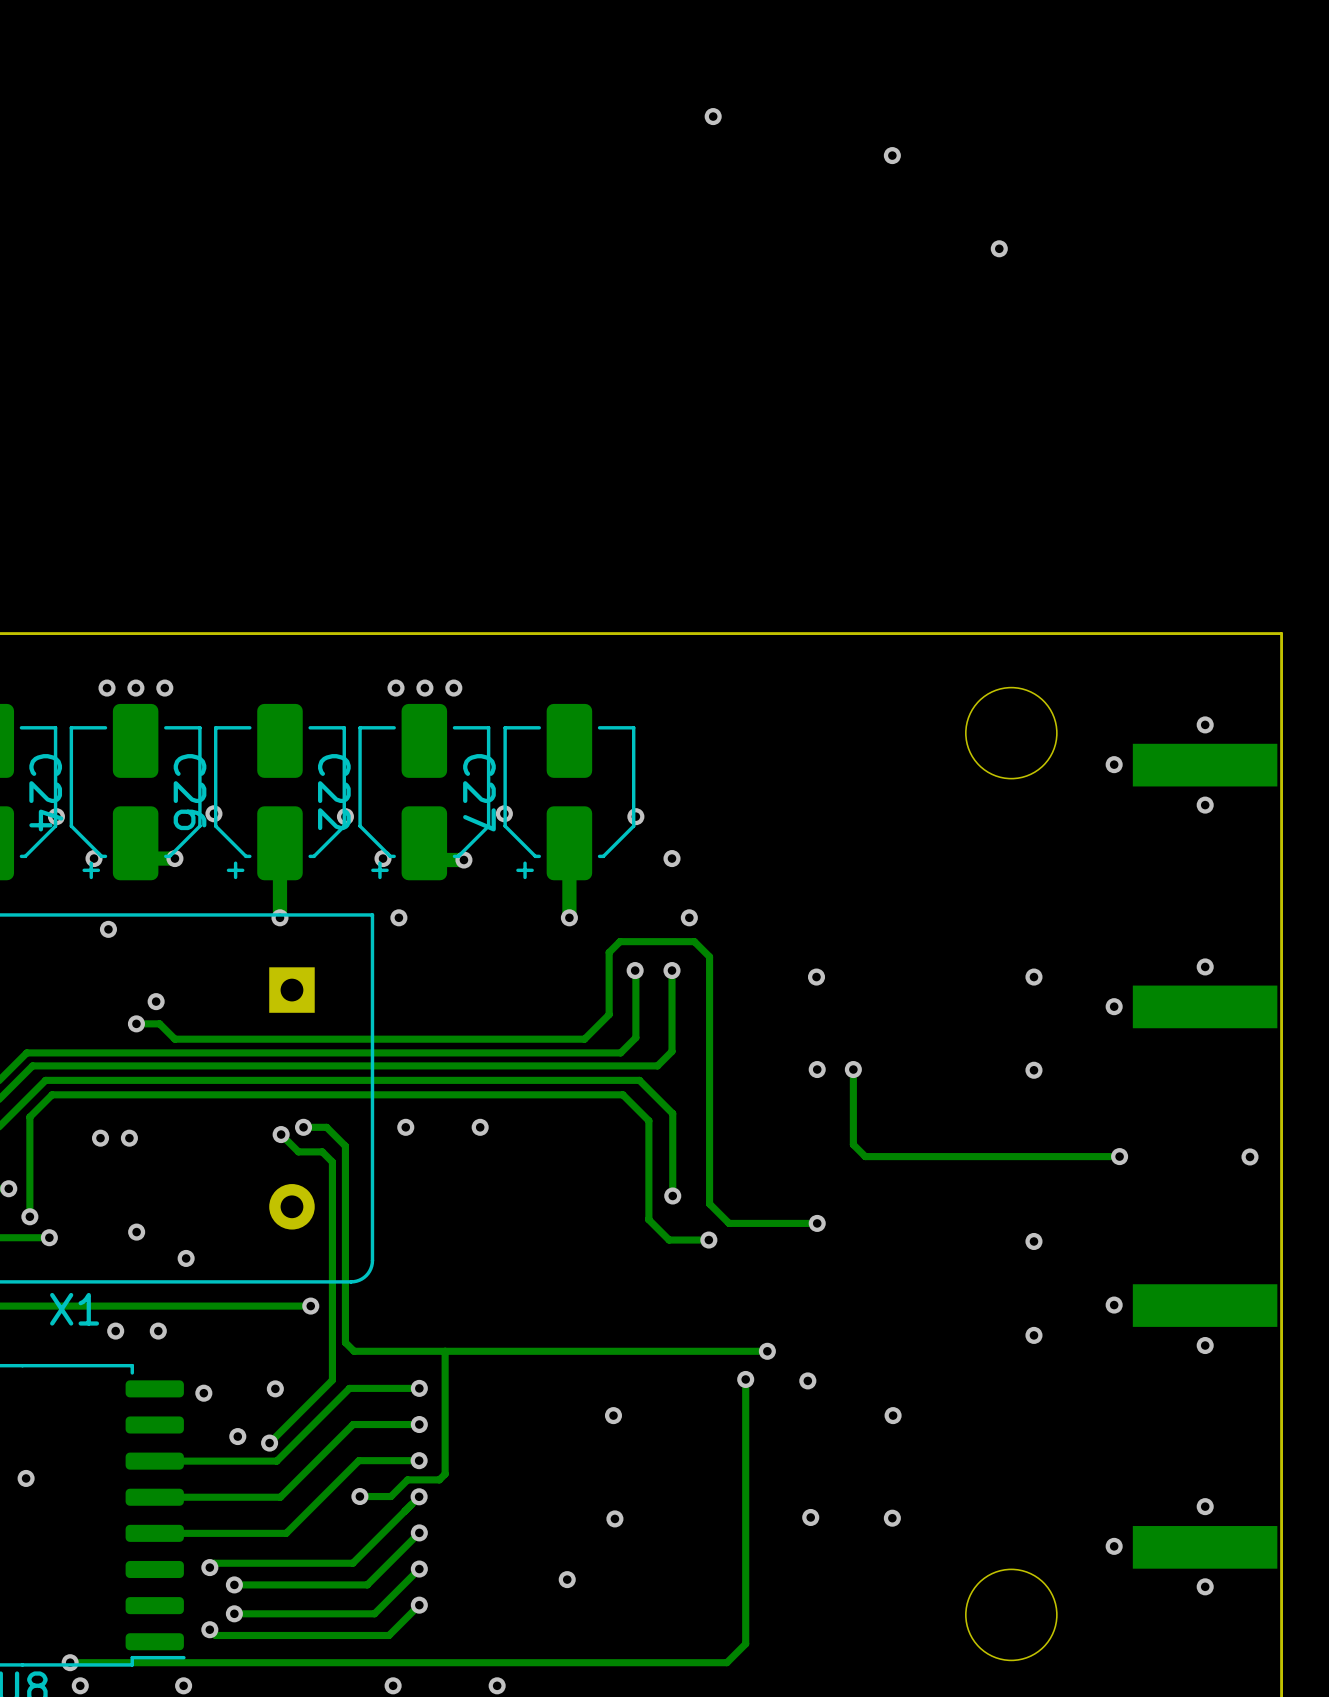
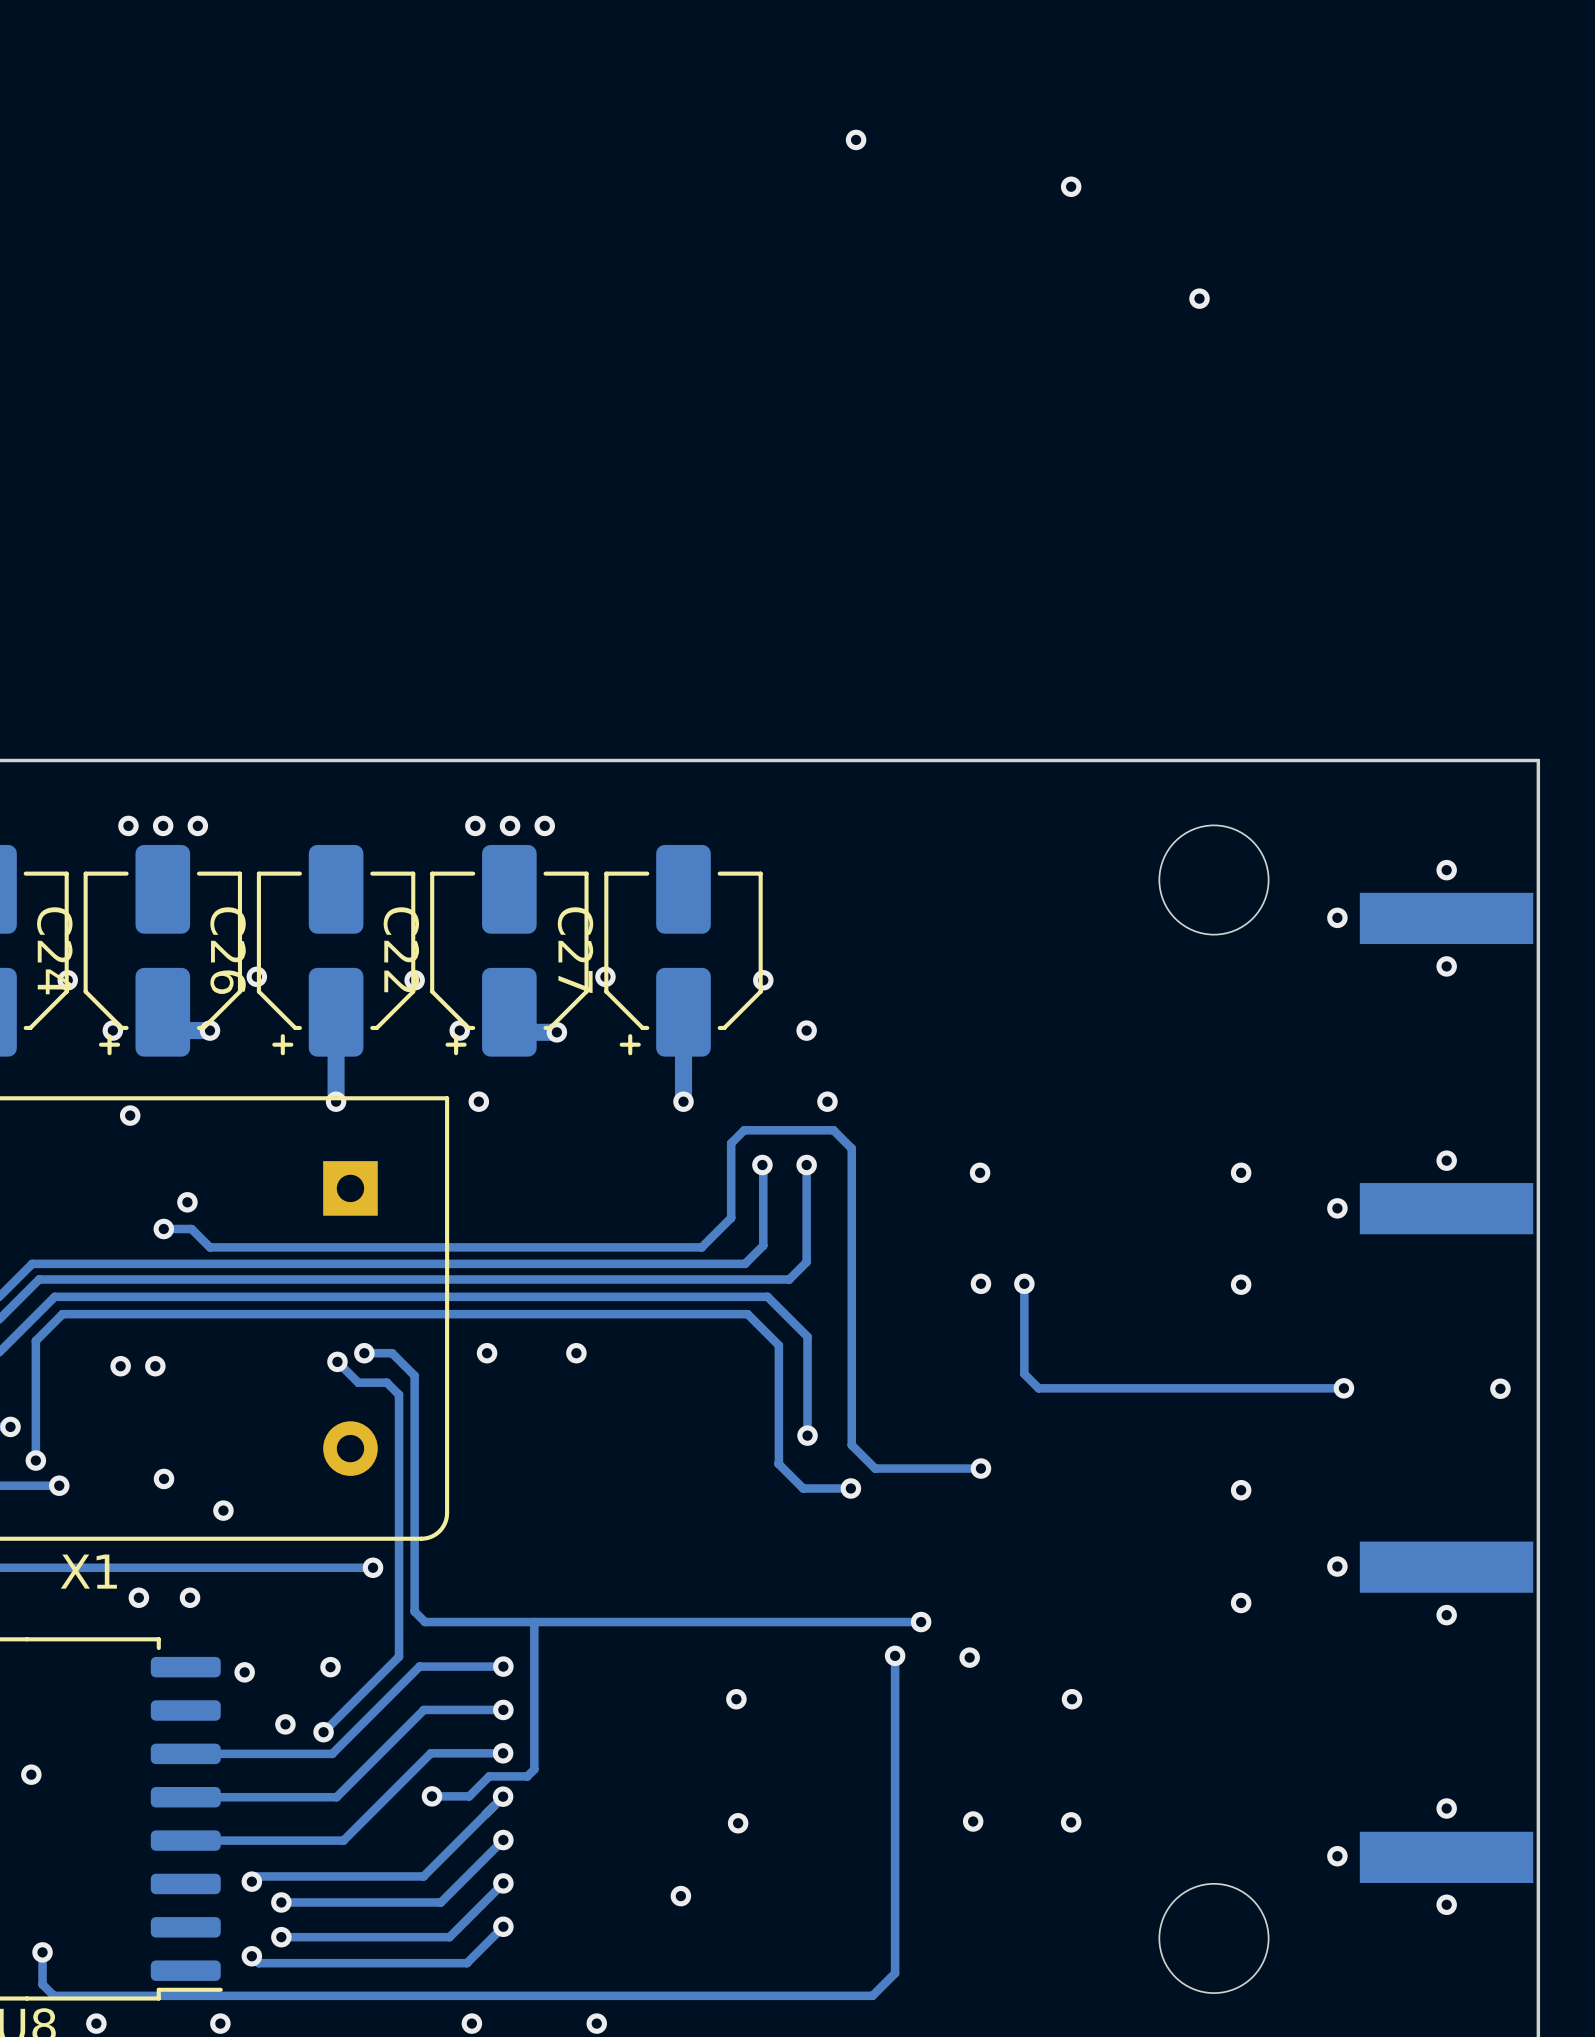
track: none -> (42, 1952) (42, 1984) (53, 1995) (84, 1995)
via position: (70, 1662) -> (42, 1952)

